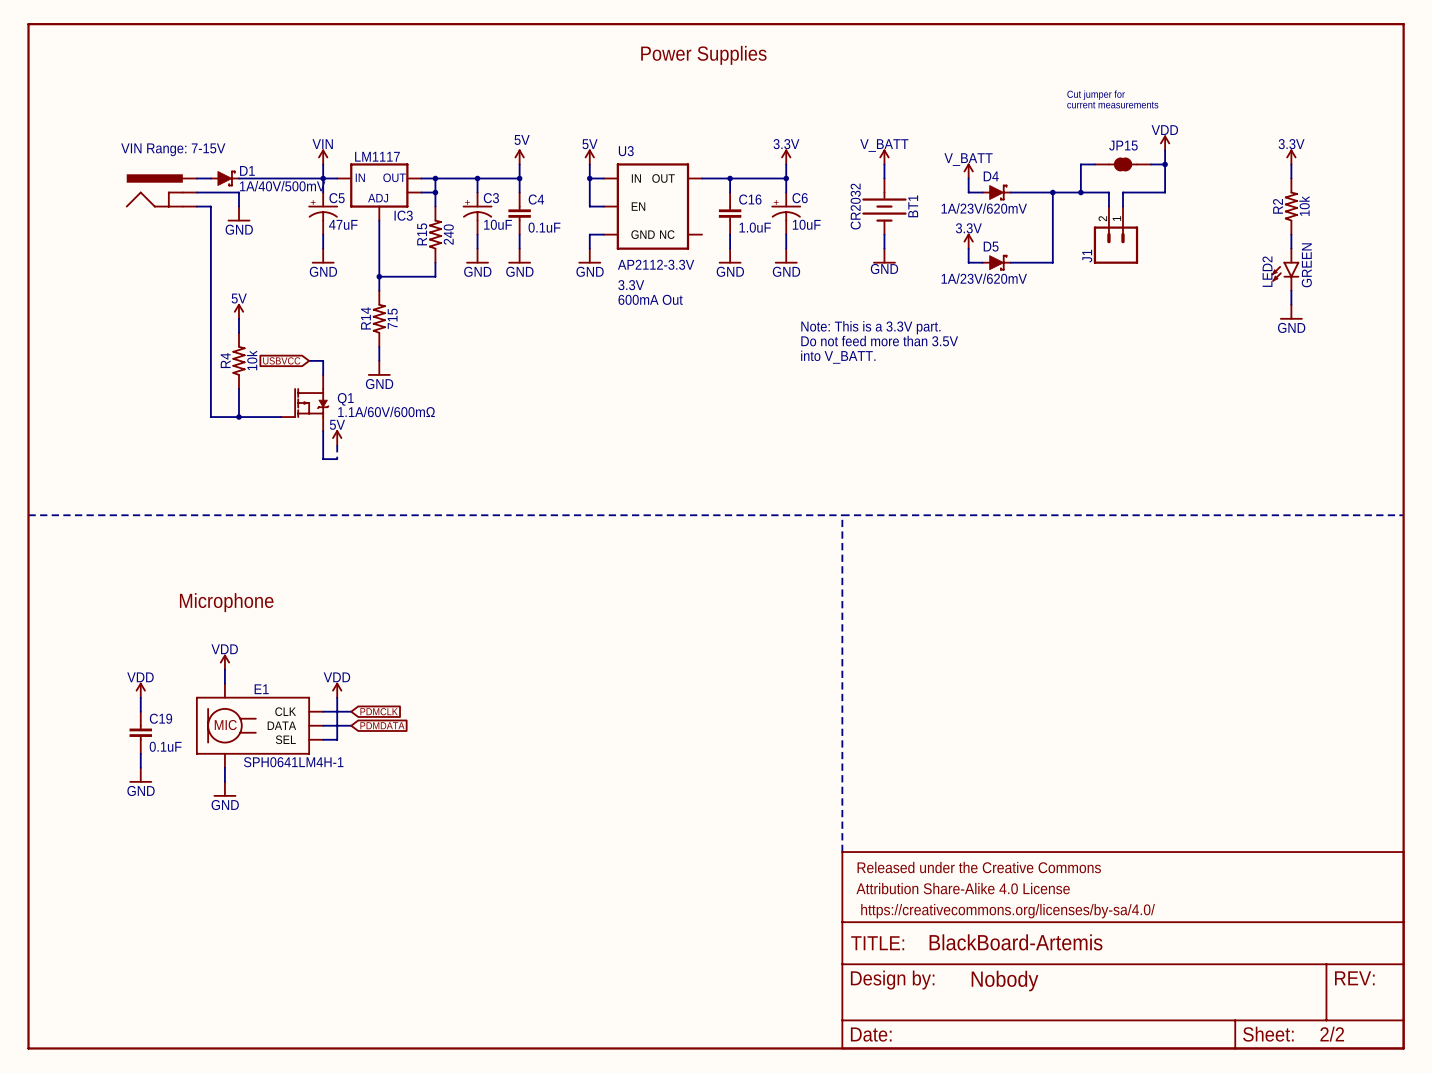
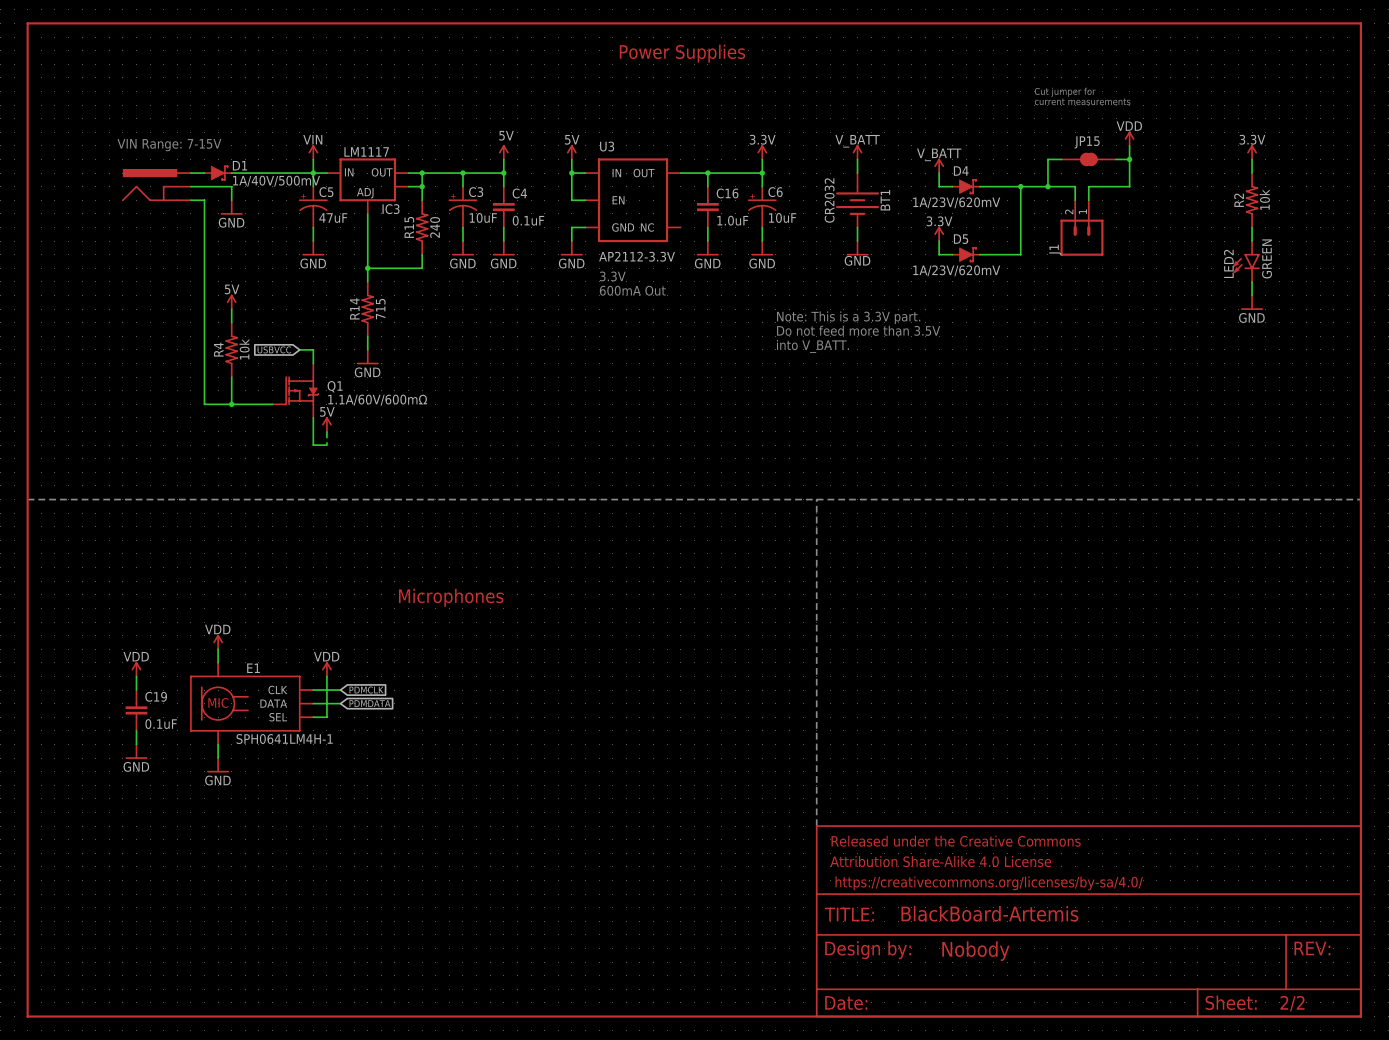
text: Microphone (226, 602) -> none
text: none -> Microphones (451, 597)

